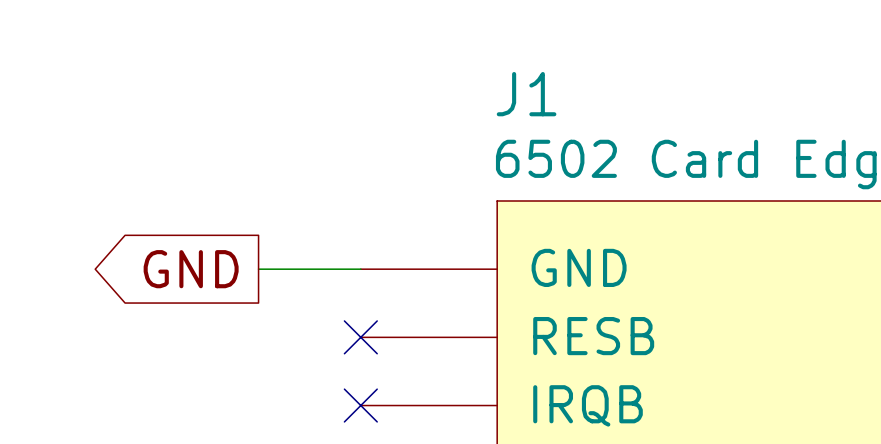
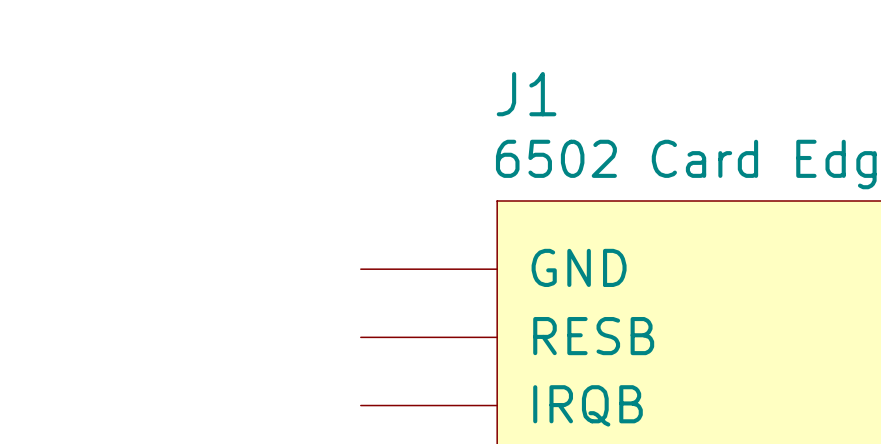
global label: GND (191, 269) -> none
wire: (258, 269) (360, 269) -> none
no-connect mark: (360, 337) -> none
no-connect mark: (360, 405) -> none

